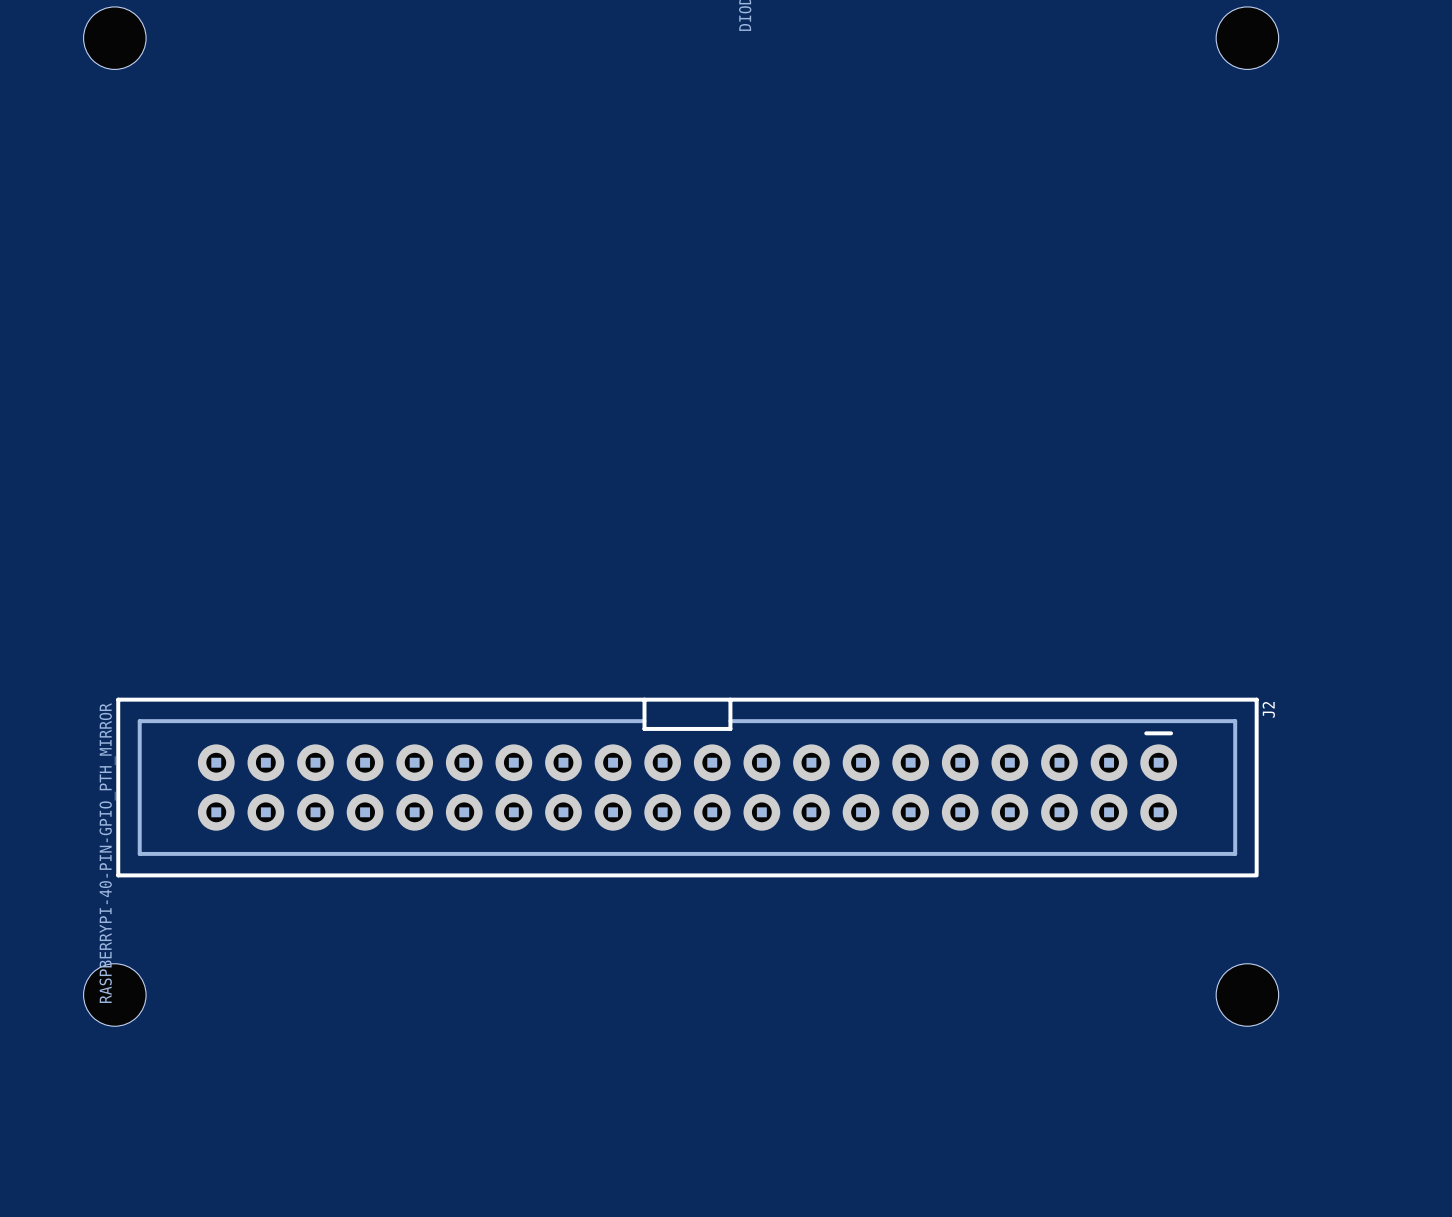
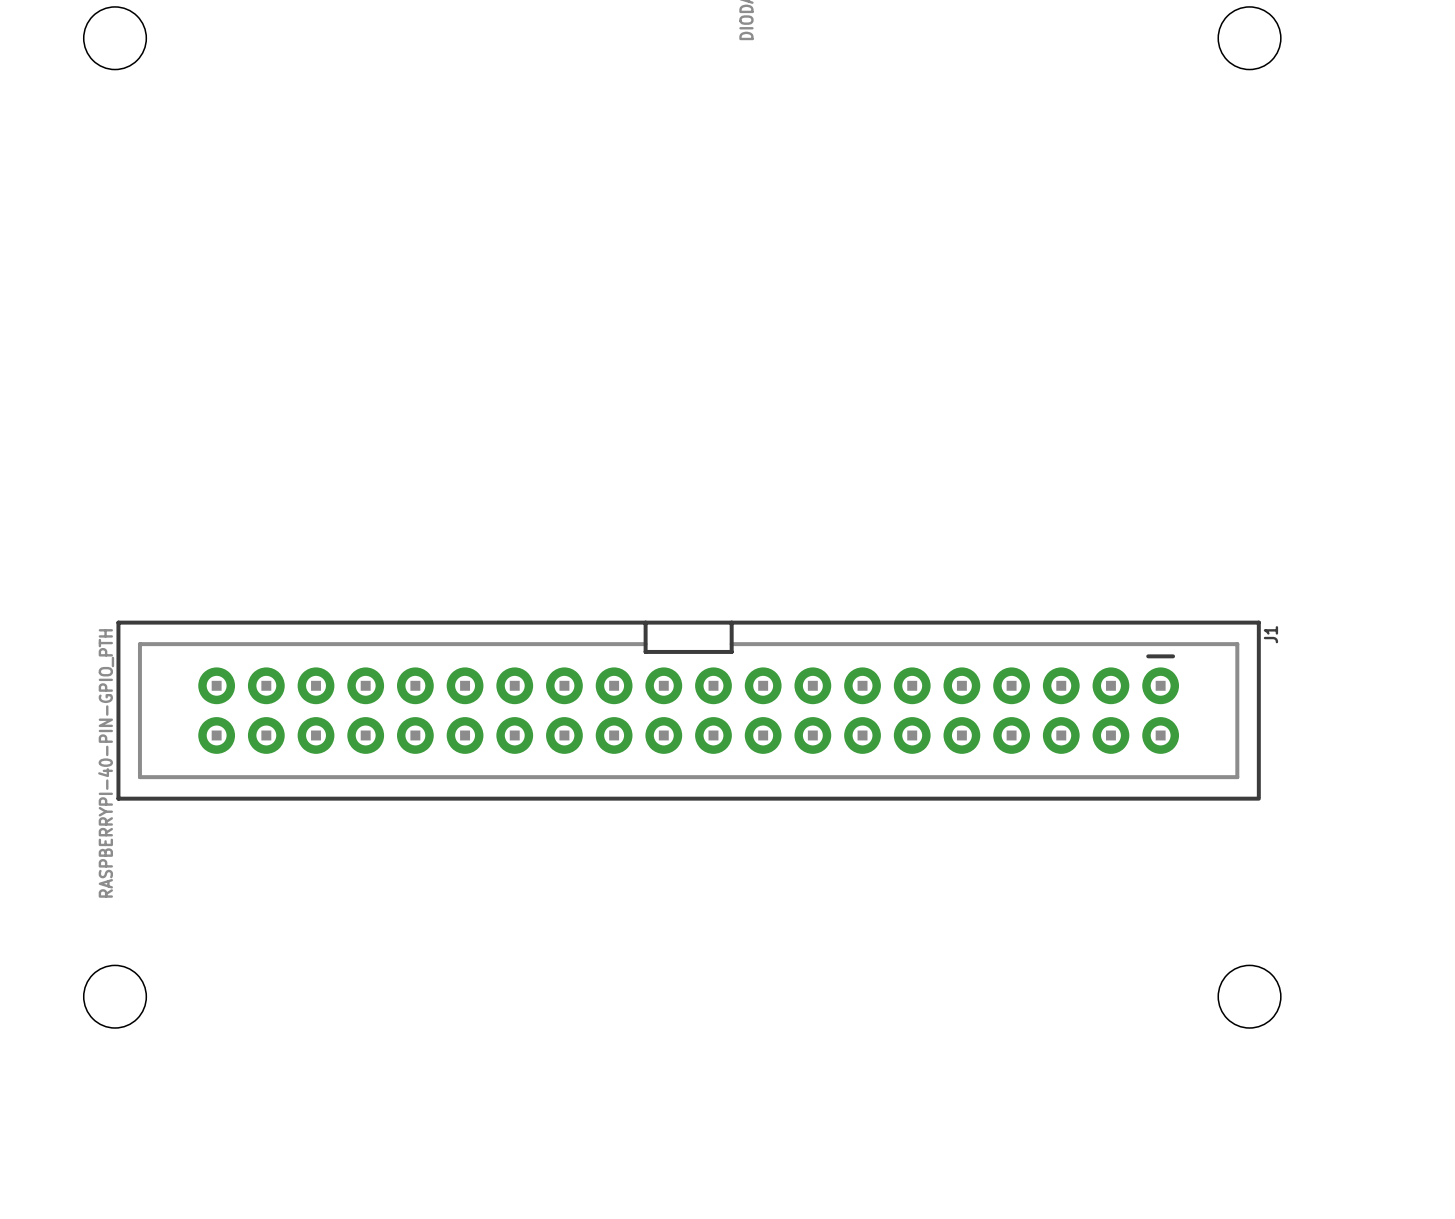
J1: none -> RASPBERRYPI-40-PIN-GPIO_PTH (688, 710)
J2: RASPBERRYPI-40-PIN-GPIO_PTH_MIRROR (687, 787) -> none

